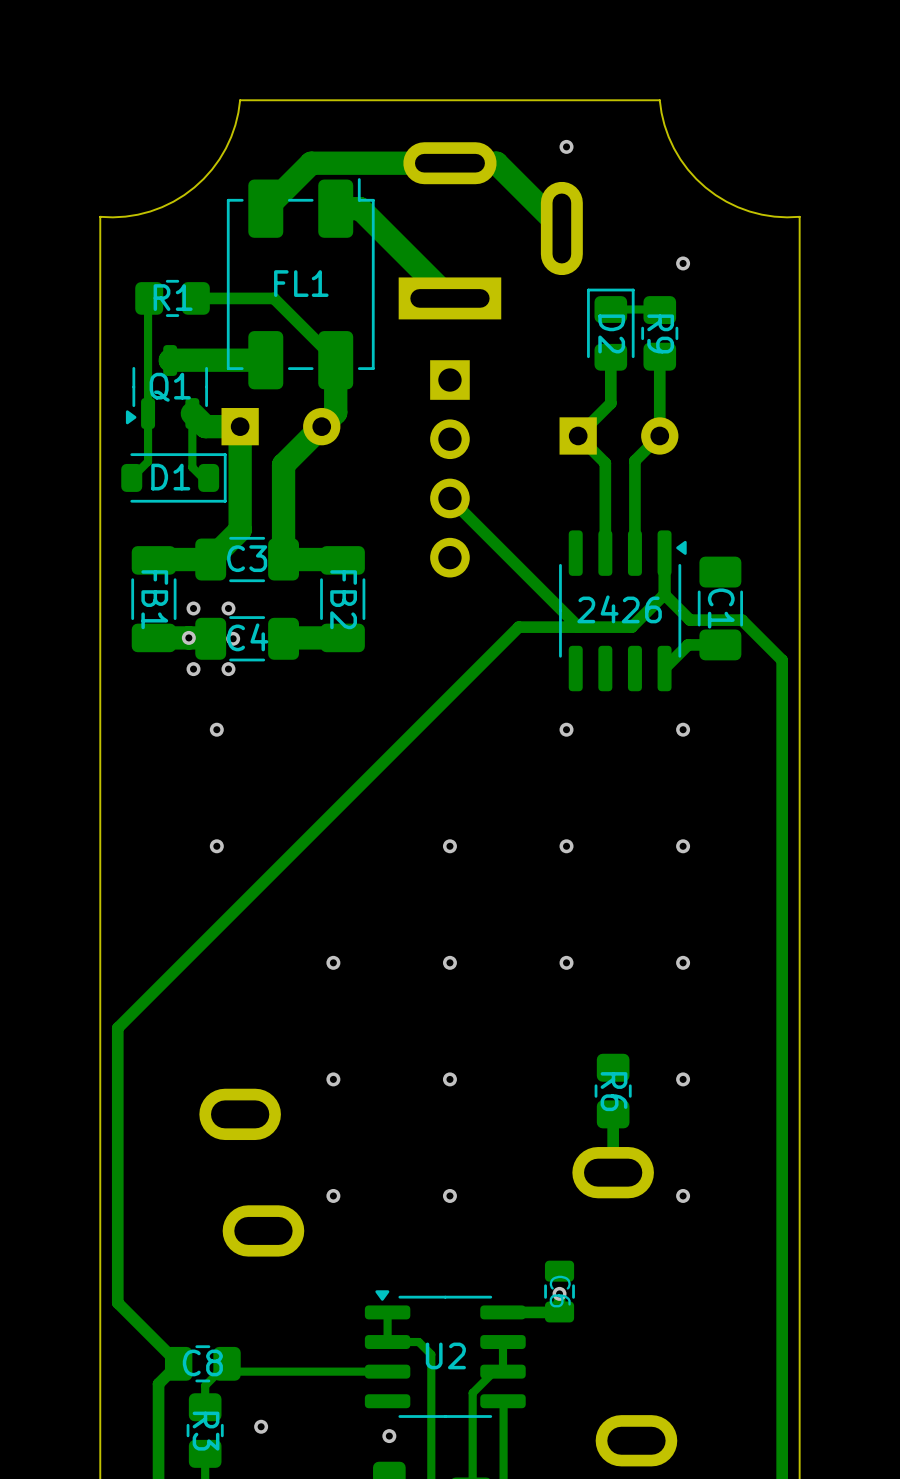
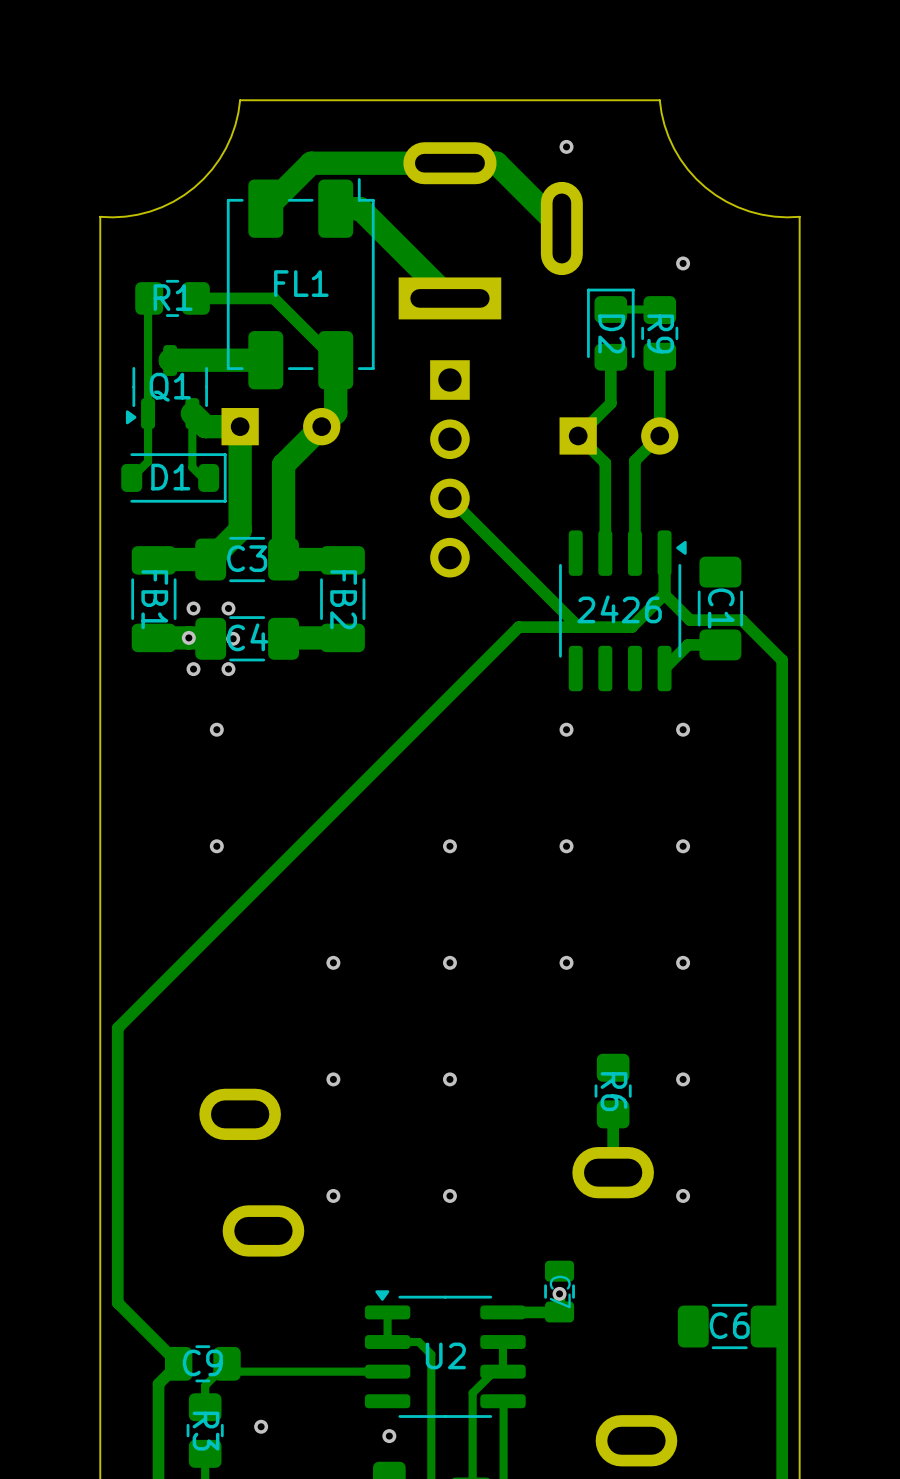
C6 name: C6 (560, 1291) -> C7 (560, 1291)
C6: none -> (729, 1326)
C8 name: C8 (202, 1362) -> C9 (202, 1362)

